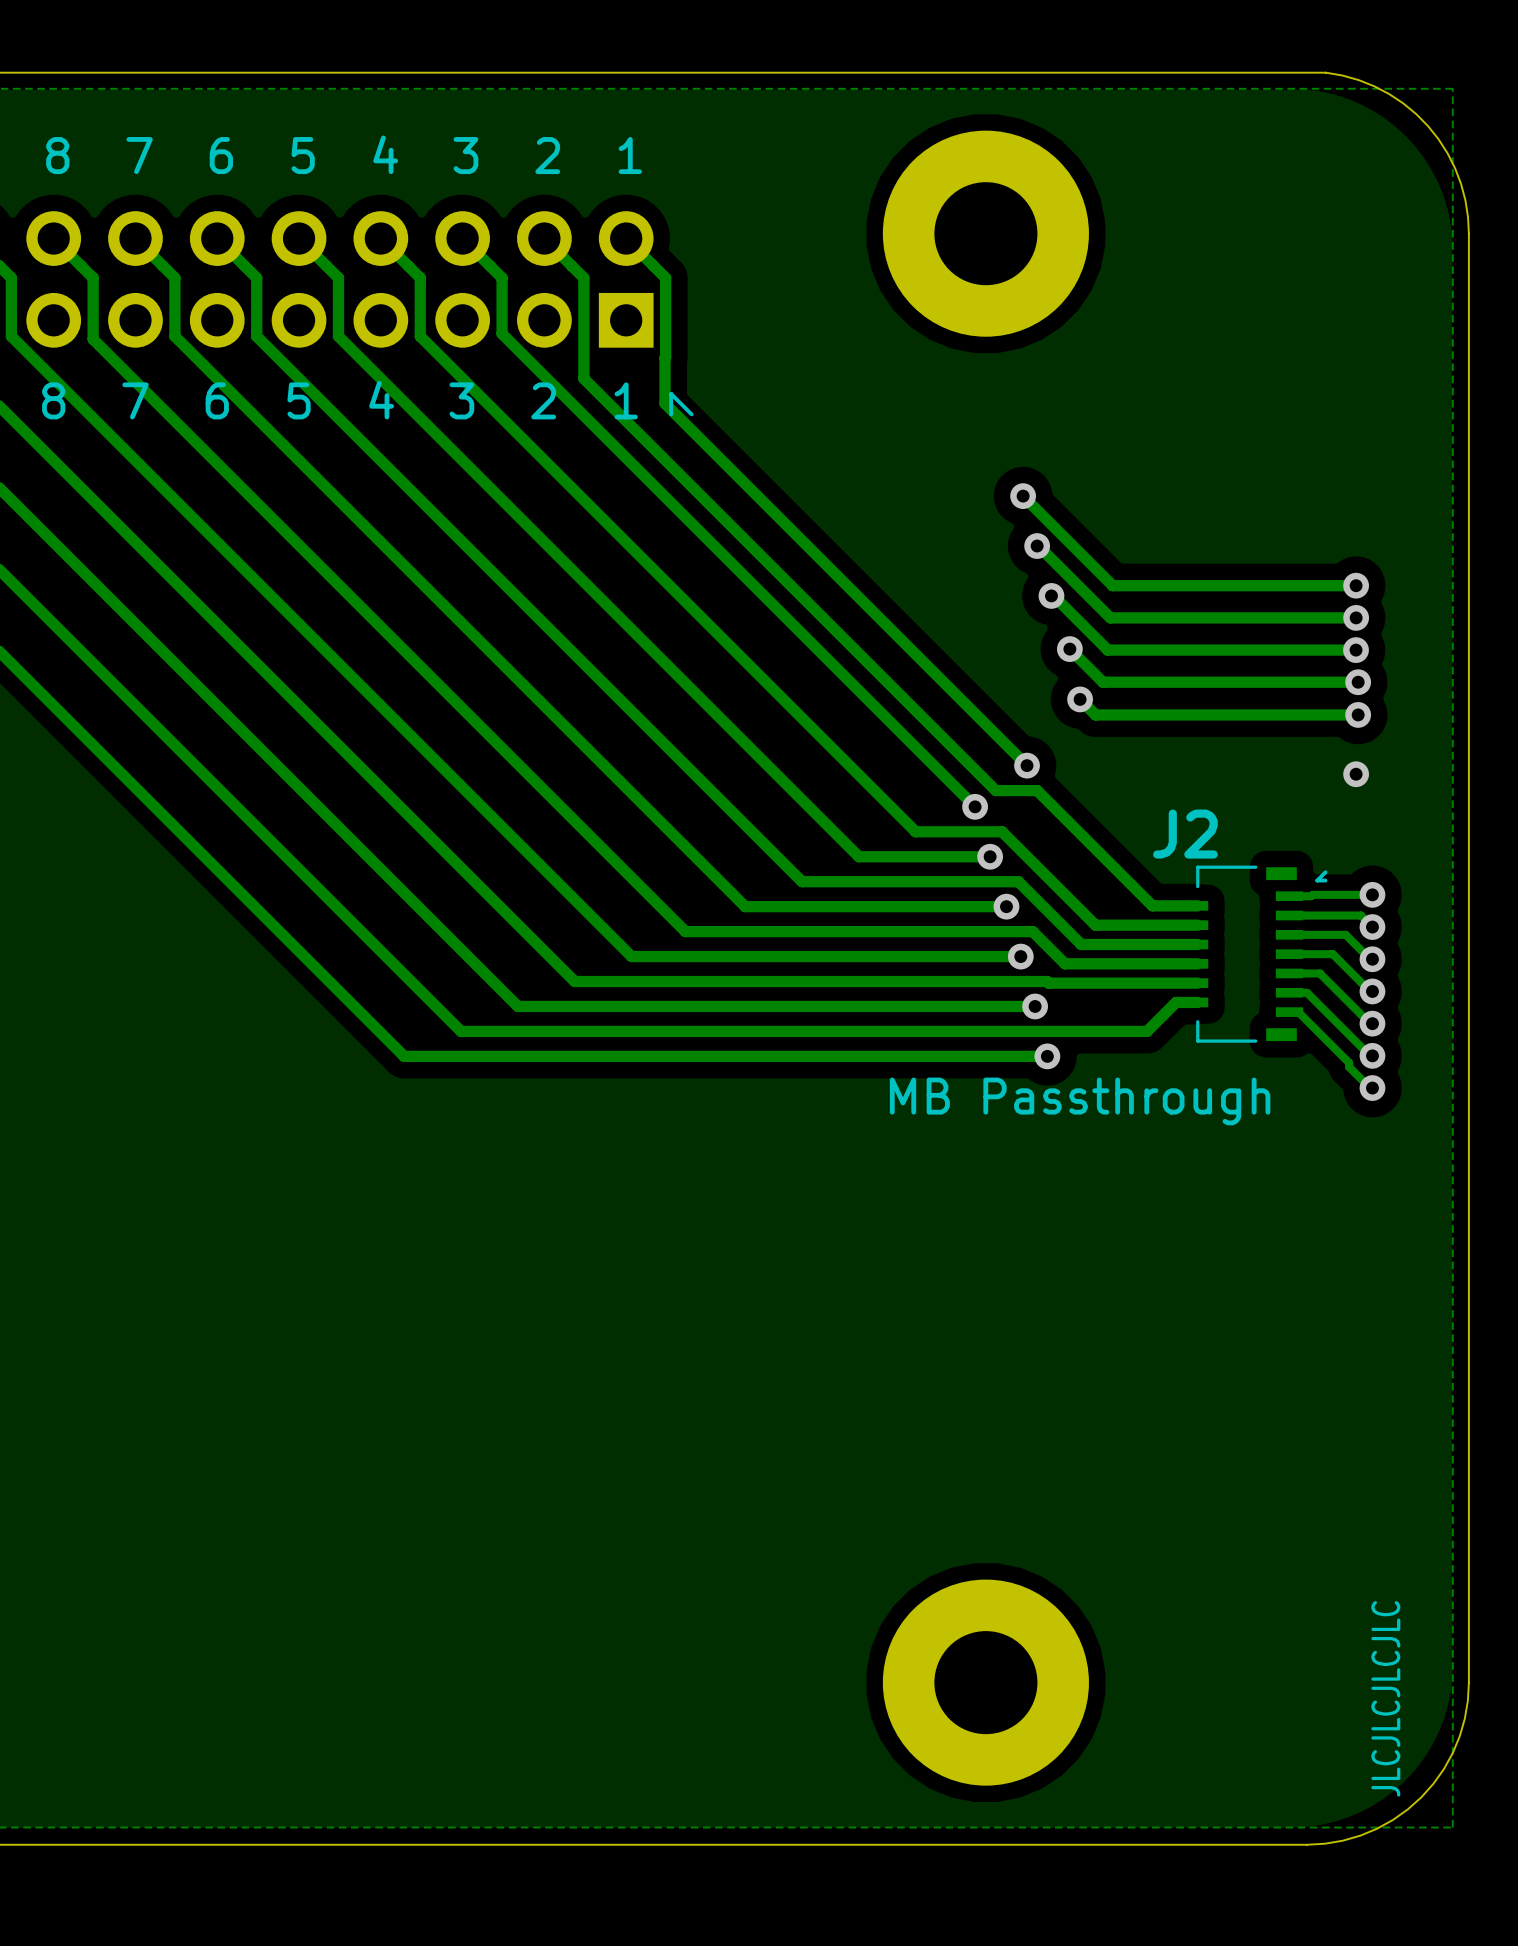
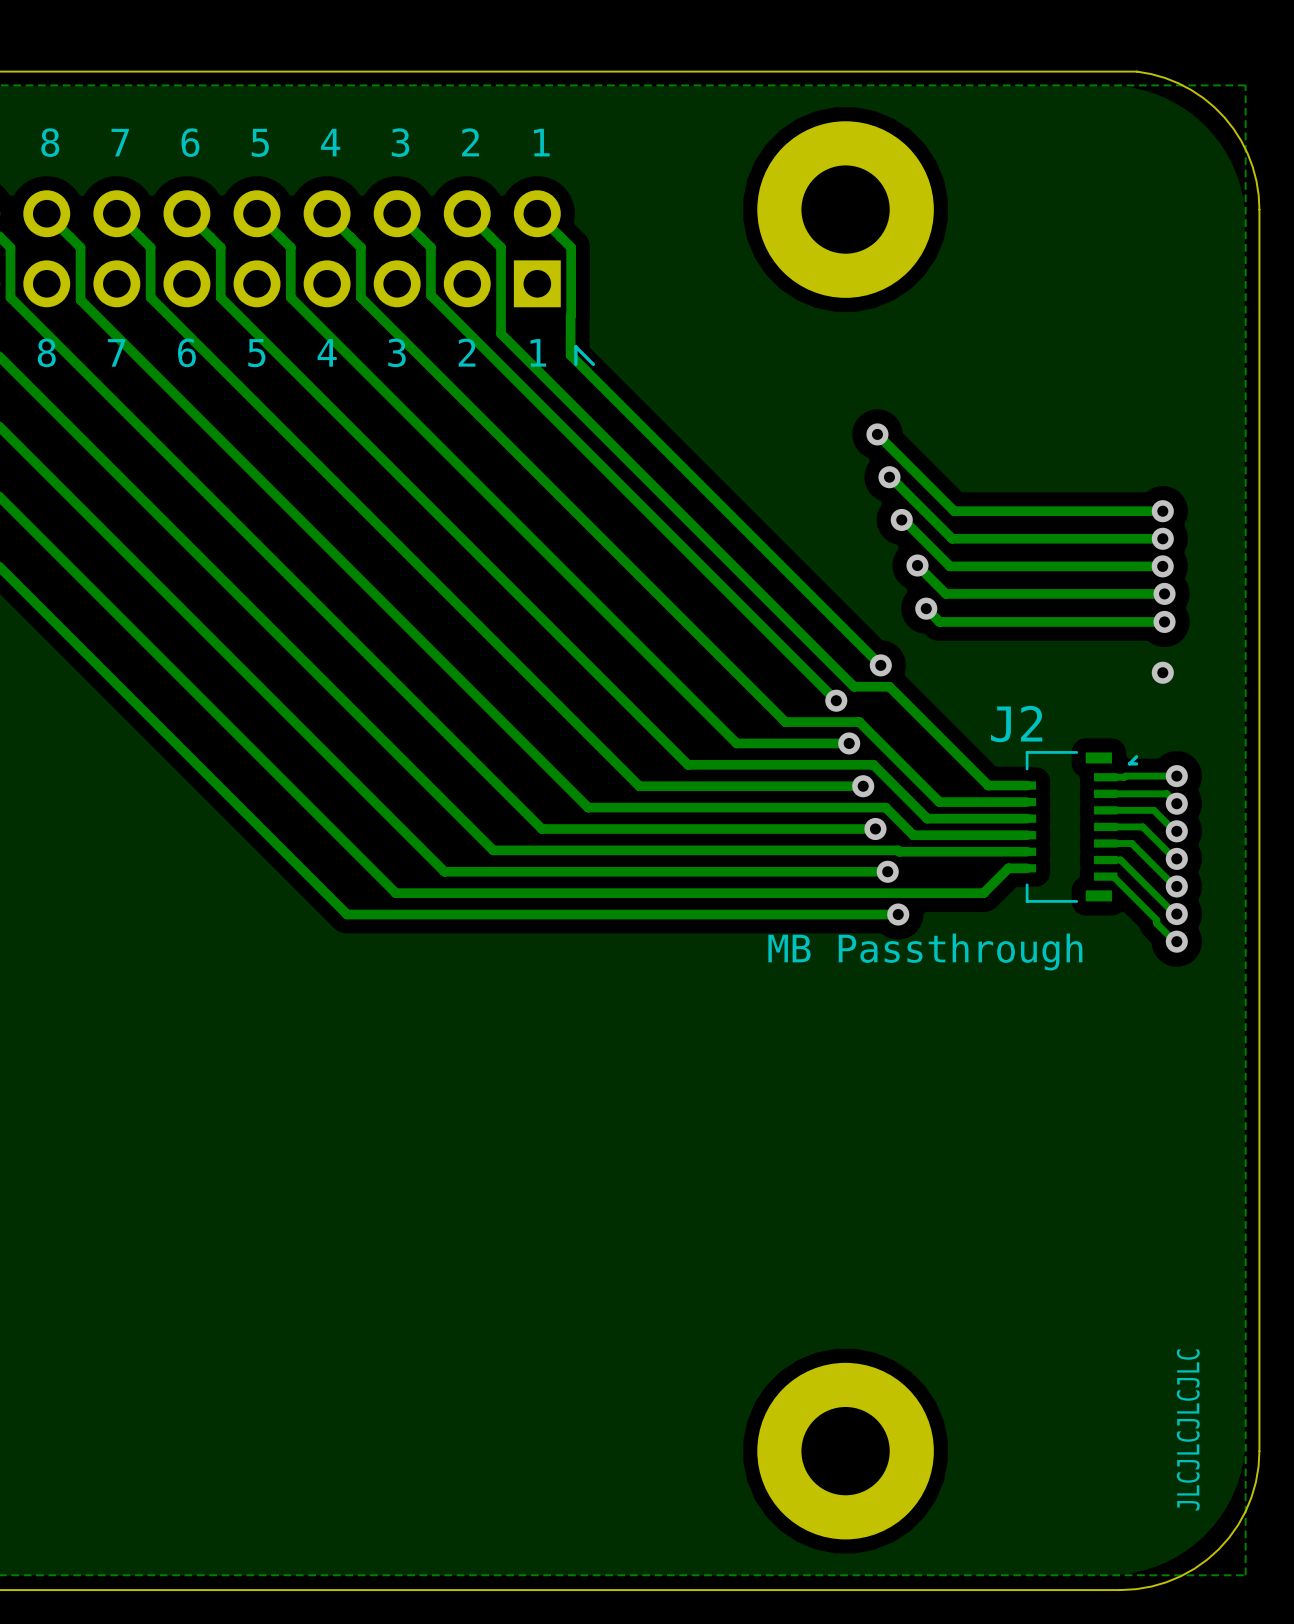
text position: JLCJLCJLCJLC (1385, 1698) -> JLCJLCJLCJLC (1188, 1429)

